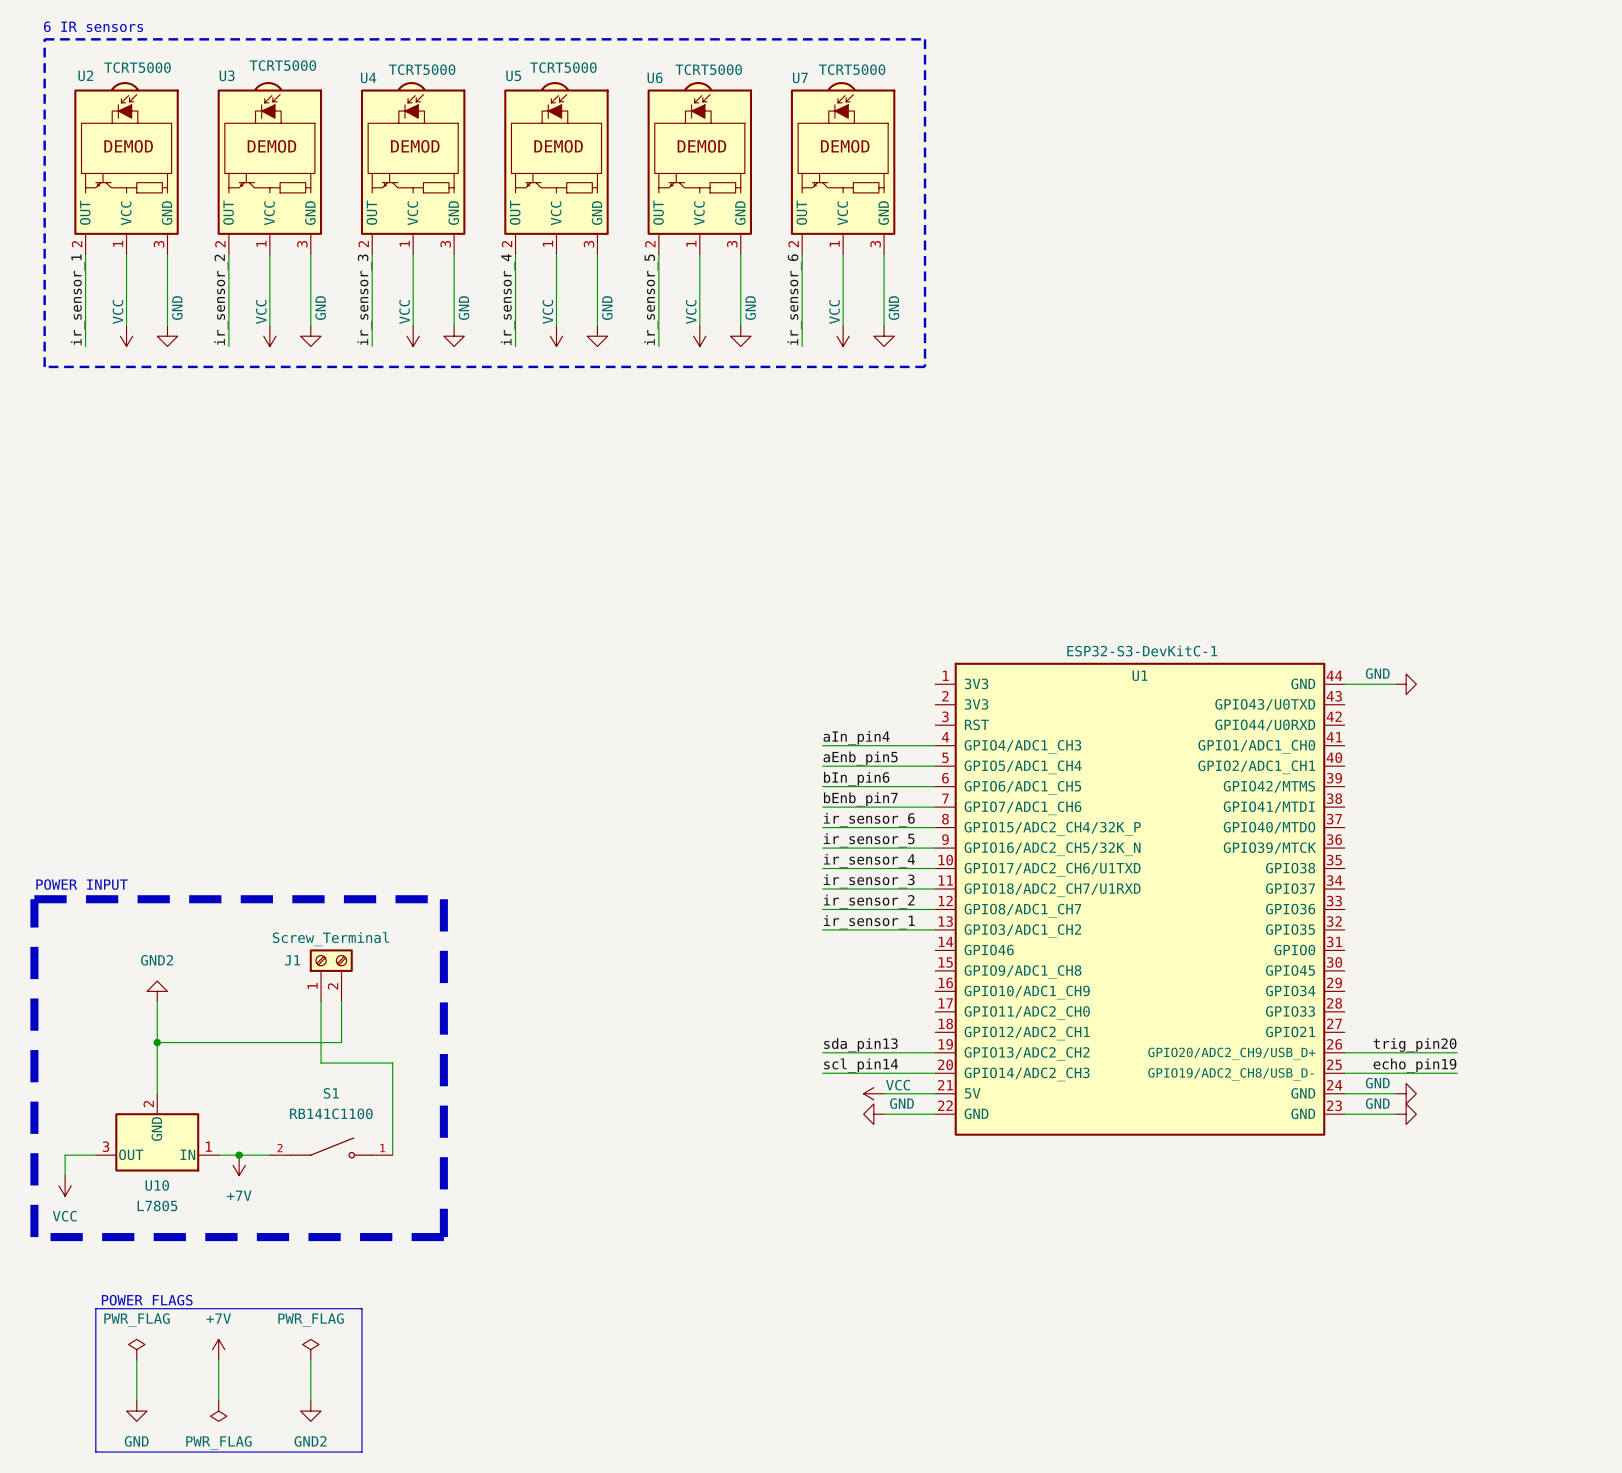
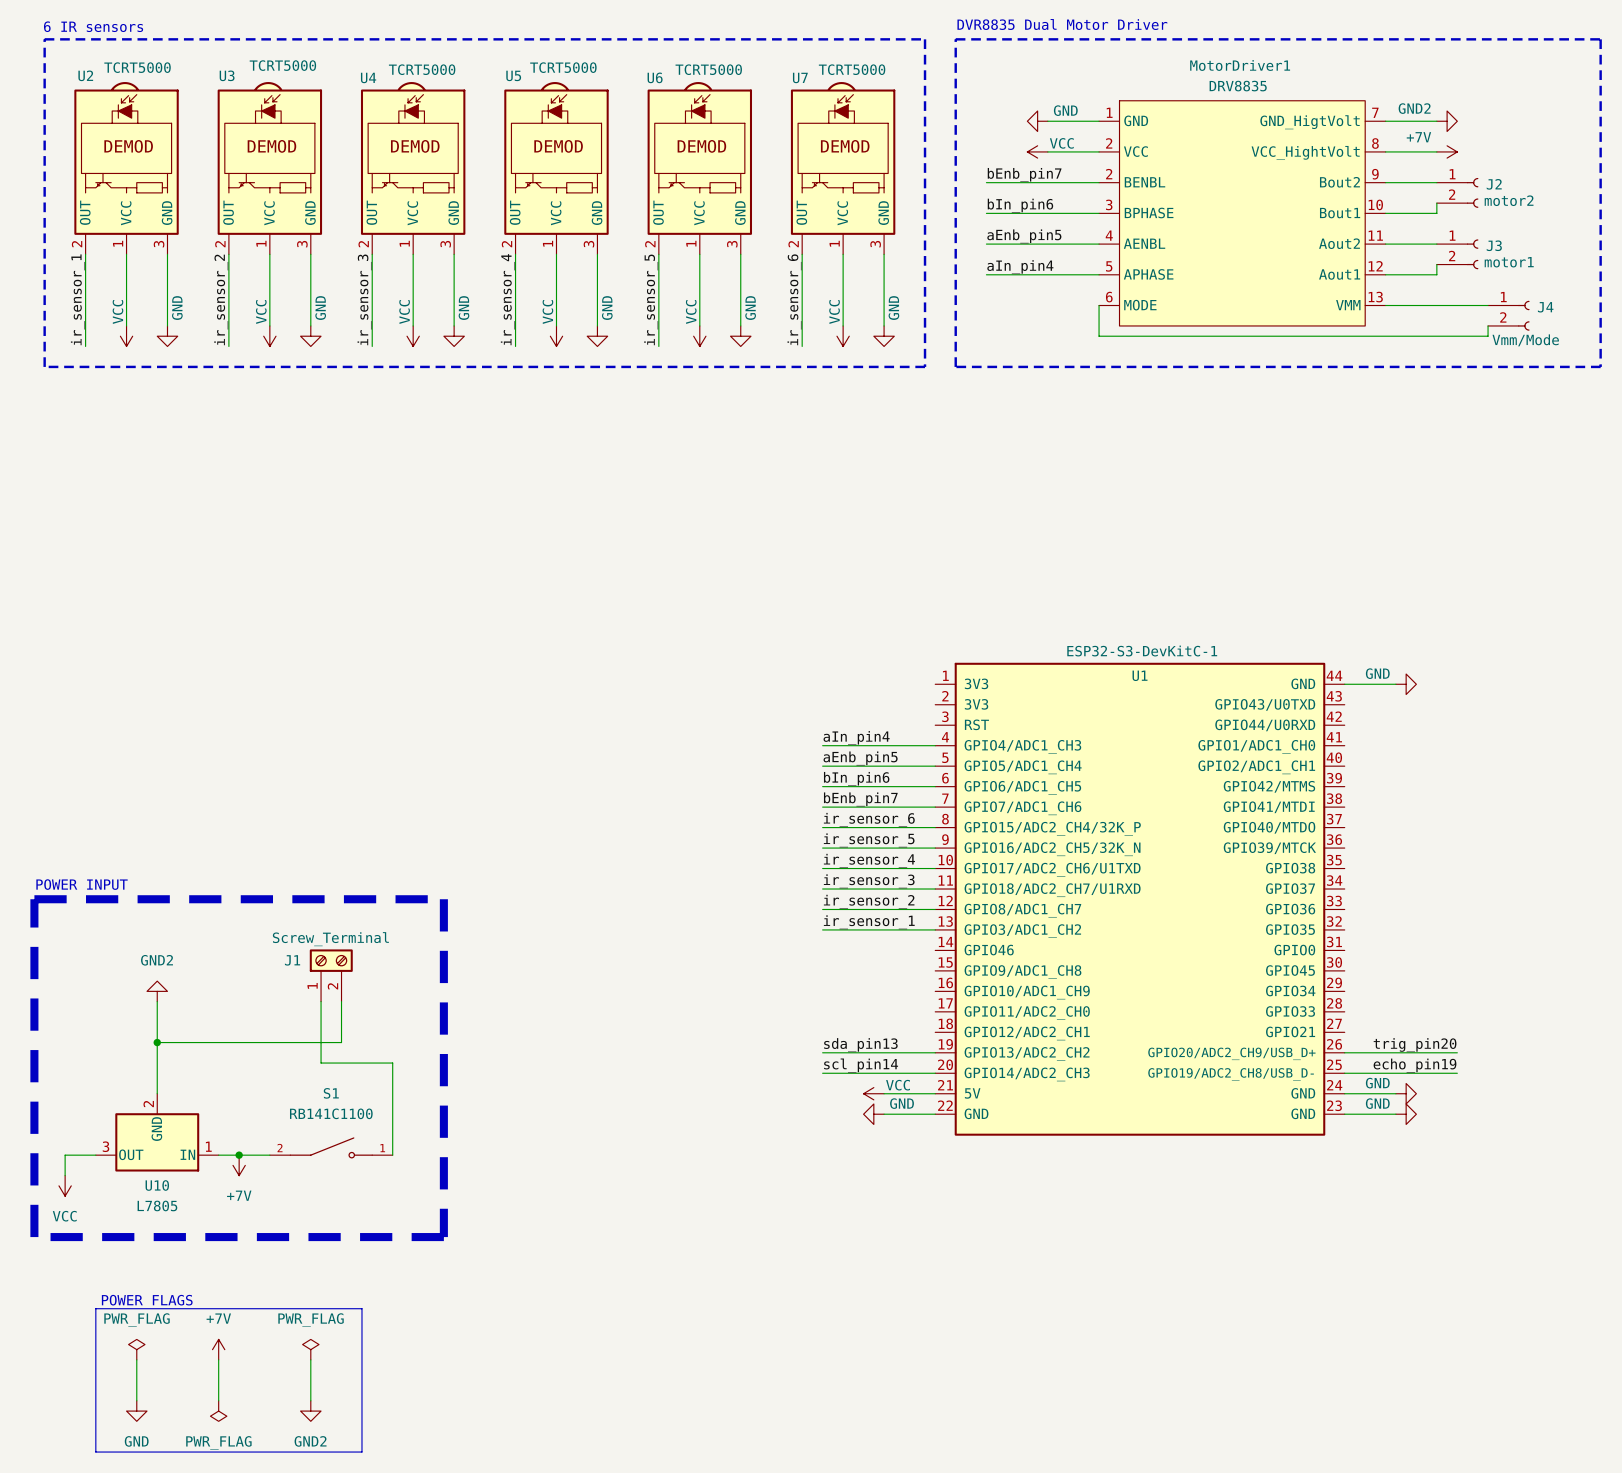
text: none -> DVR8835 Dual Motor Driver (1062, 24)
line: none -> (955, 39) (1600, 39) (1600, 366) (955, 366) (955, 39)
power symbol: none -> GND (1037, 121)
wire: none -> (1047, 121) (1099, 121)
wire: none -> (1385, 121) (1436, 121)
power symbol: none -> GND2 (1447, 121)
power symbol: none -> VCC (1037, 151)
wire: none -> (1047, 151) (1099, 151)
wire: none -> (1385, 151) (1436, 151)
power symbol: none -> +7V (1447, 151)
label: none -> bEnb_pin7 (1024, 174)
wire: none -> (986, 182) (1099, 182)
wire: none -> (1385, 182) (1436, 182)
J2: none -> motor2 (1457, 192)
wire: none -> (1436, 203) (1436, 213) (1385, 213)
label: none -> bIn_pin6 (1020, 205)
wire: none -> (986, 213) (1099, 213)
MotorDriver1: none -> DRV8835 (1242, 213)
label: none -> aEnb_pin5 (1024, 236)
wire: none -> (986, 244) (1099, 244)
wire: none -> (1385, 244) (1436, 244)
J3: none -> motor1 (1457, 254)
wire: none -> (1436, 264) (1436, 274) (1385, 274)
label: none -> aIn_pin4 (1020, 267)
wire: none -> (986, 274) (1099, 274)
wire: none -> (1099, 305) (1099, 336) (1488, 336) (1488, 325)
wire: none -> (1385, 305) (1488, 305)
J4: none -> Vmm/Mode (1508, 315)

